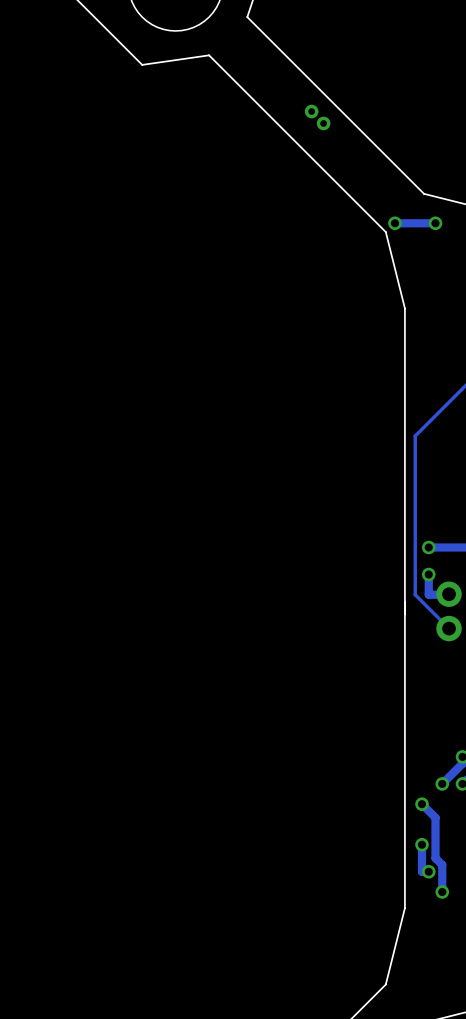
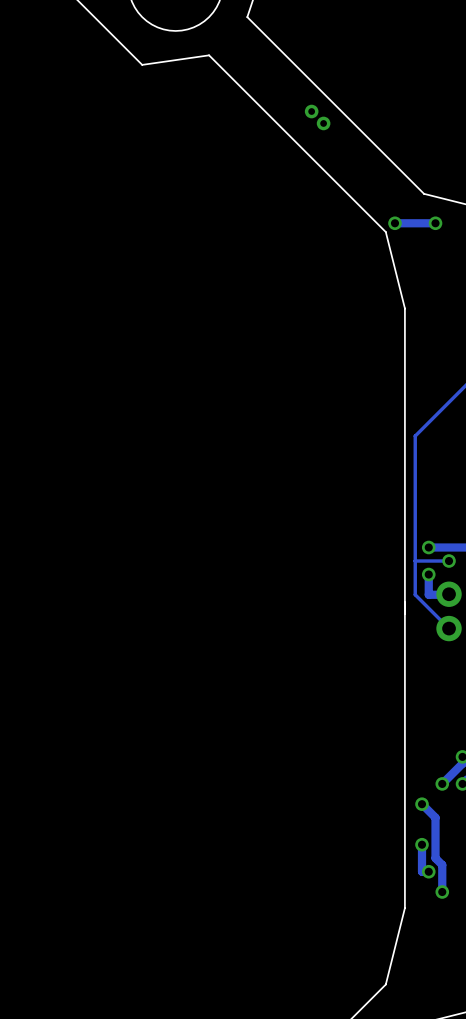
track: none -> (449, 561) (415, 561)
via: none -> (449, 561)

